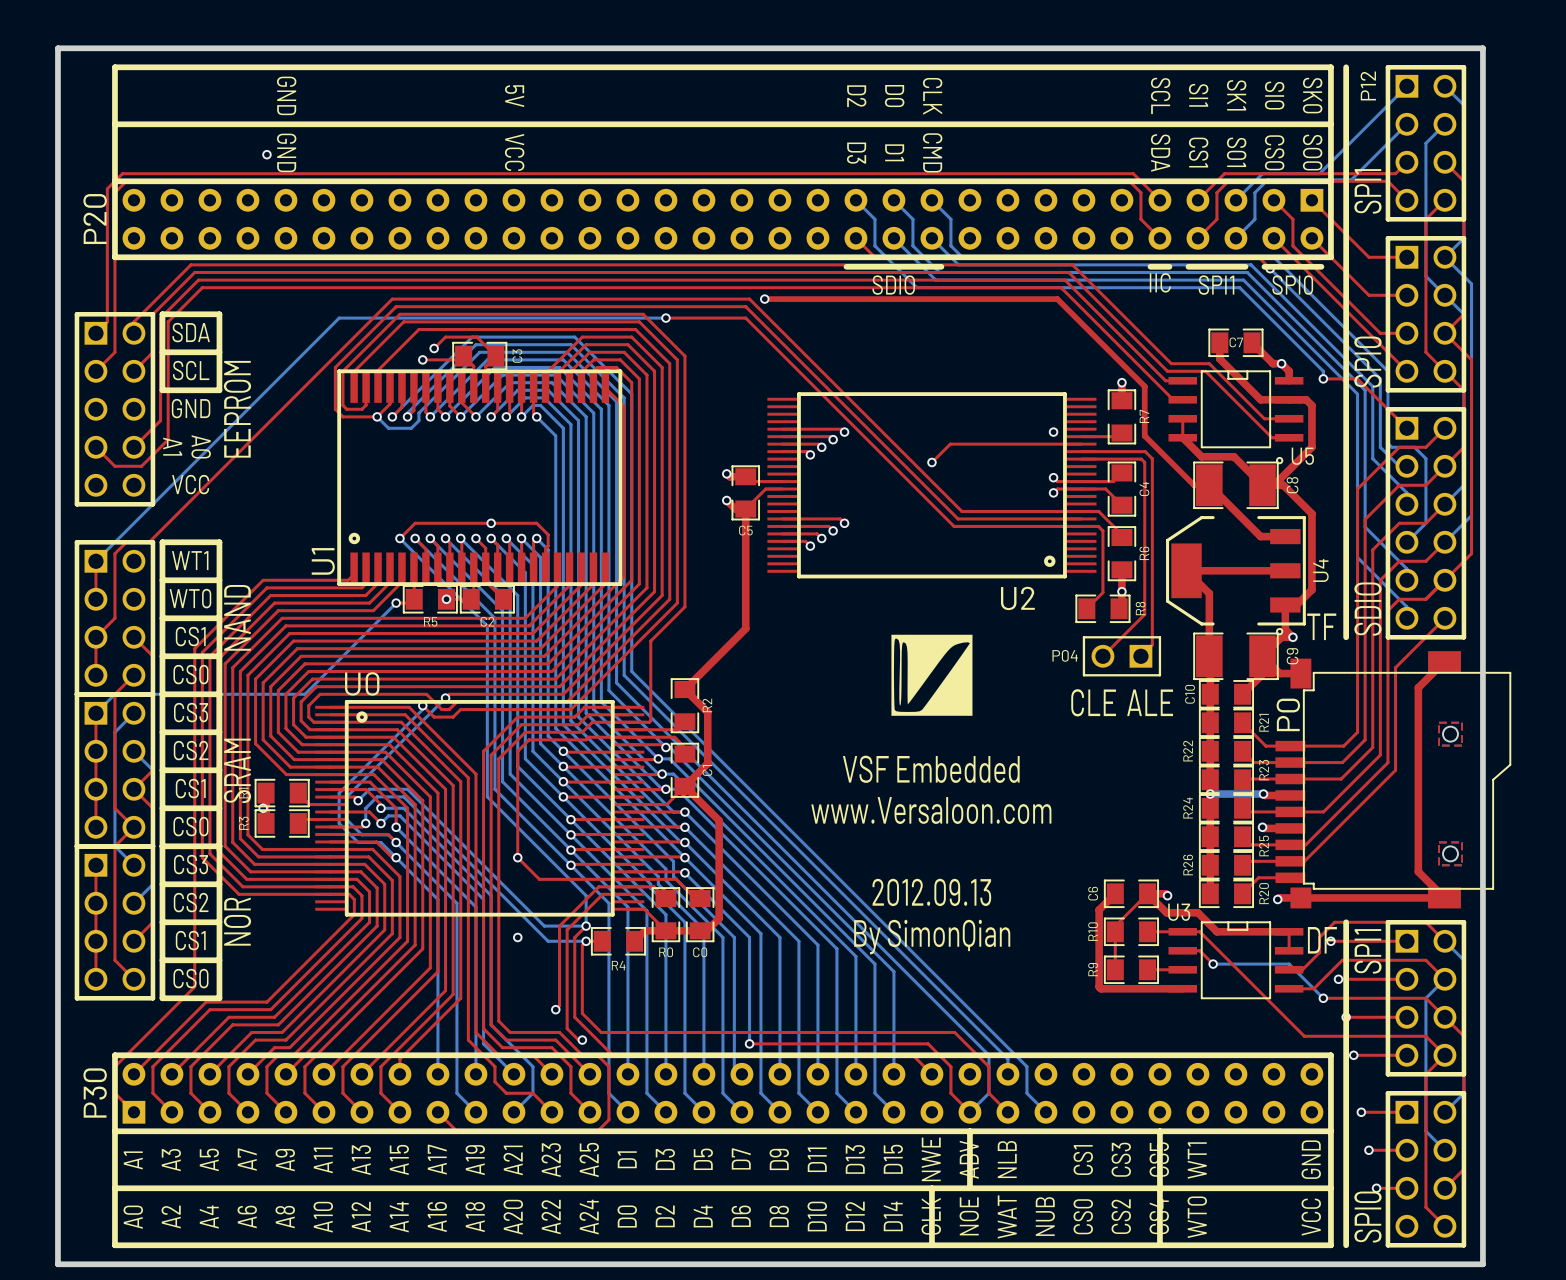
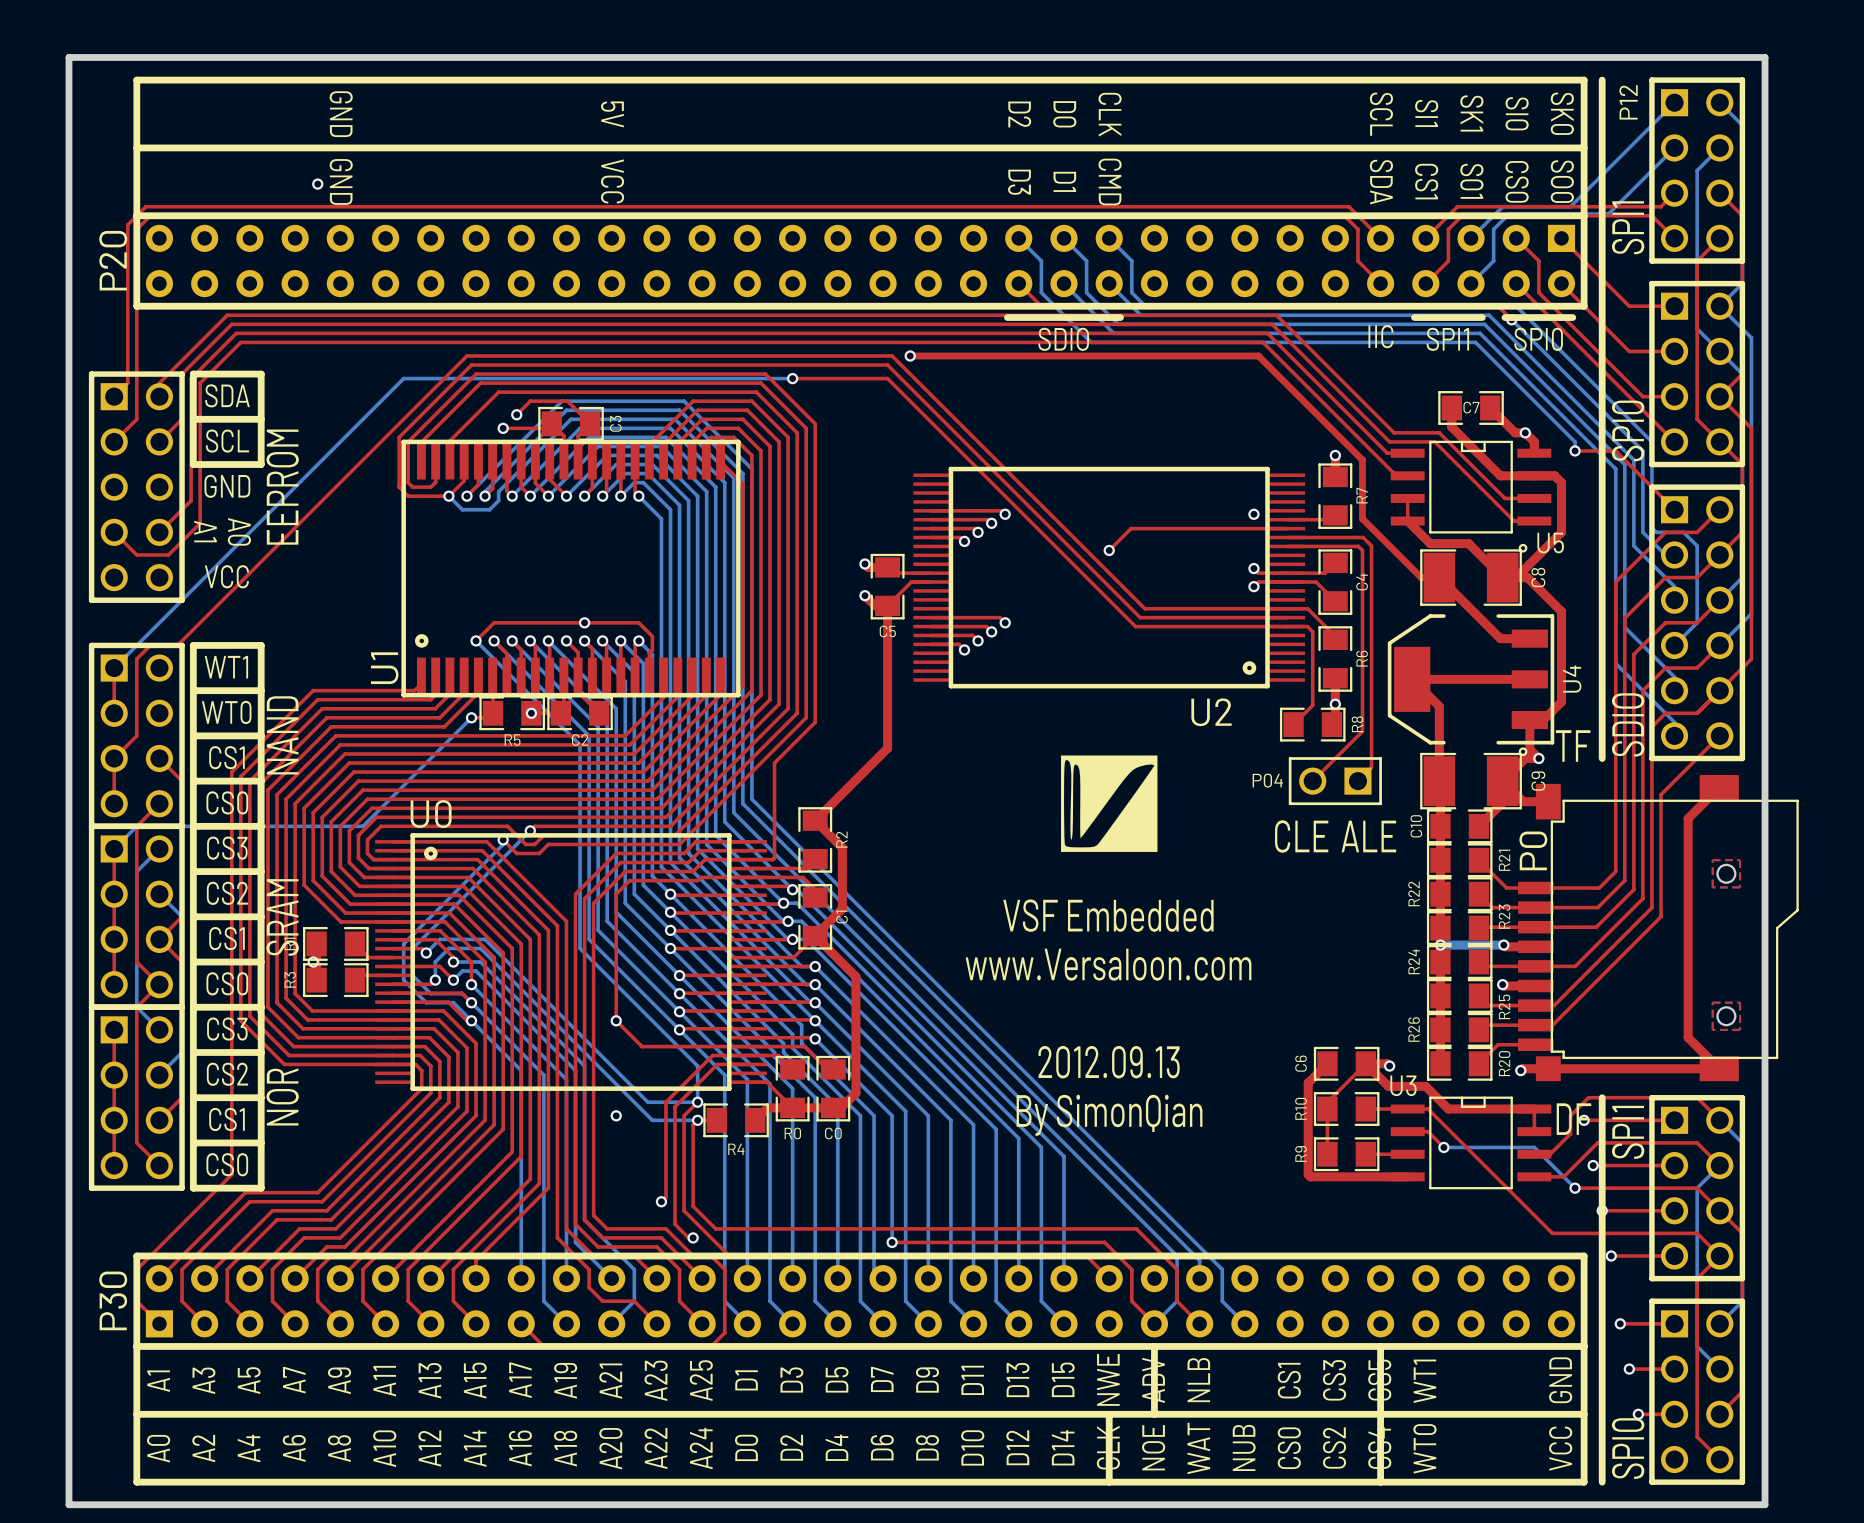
line: (1150, 266) (1169, 266) -> none

